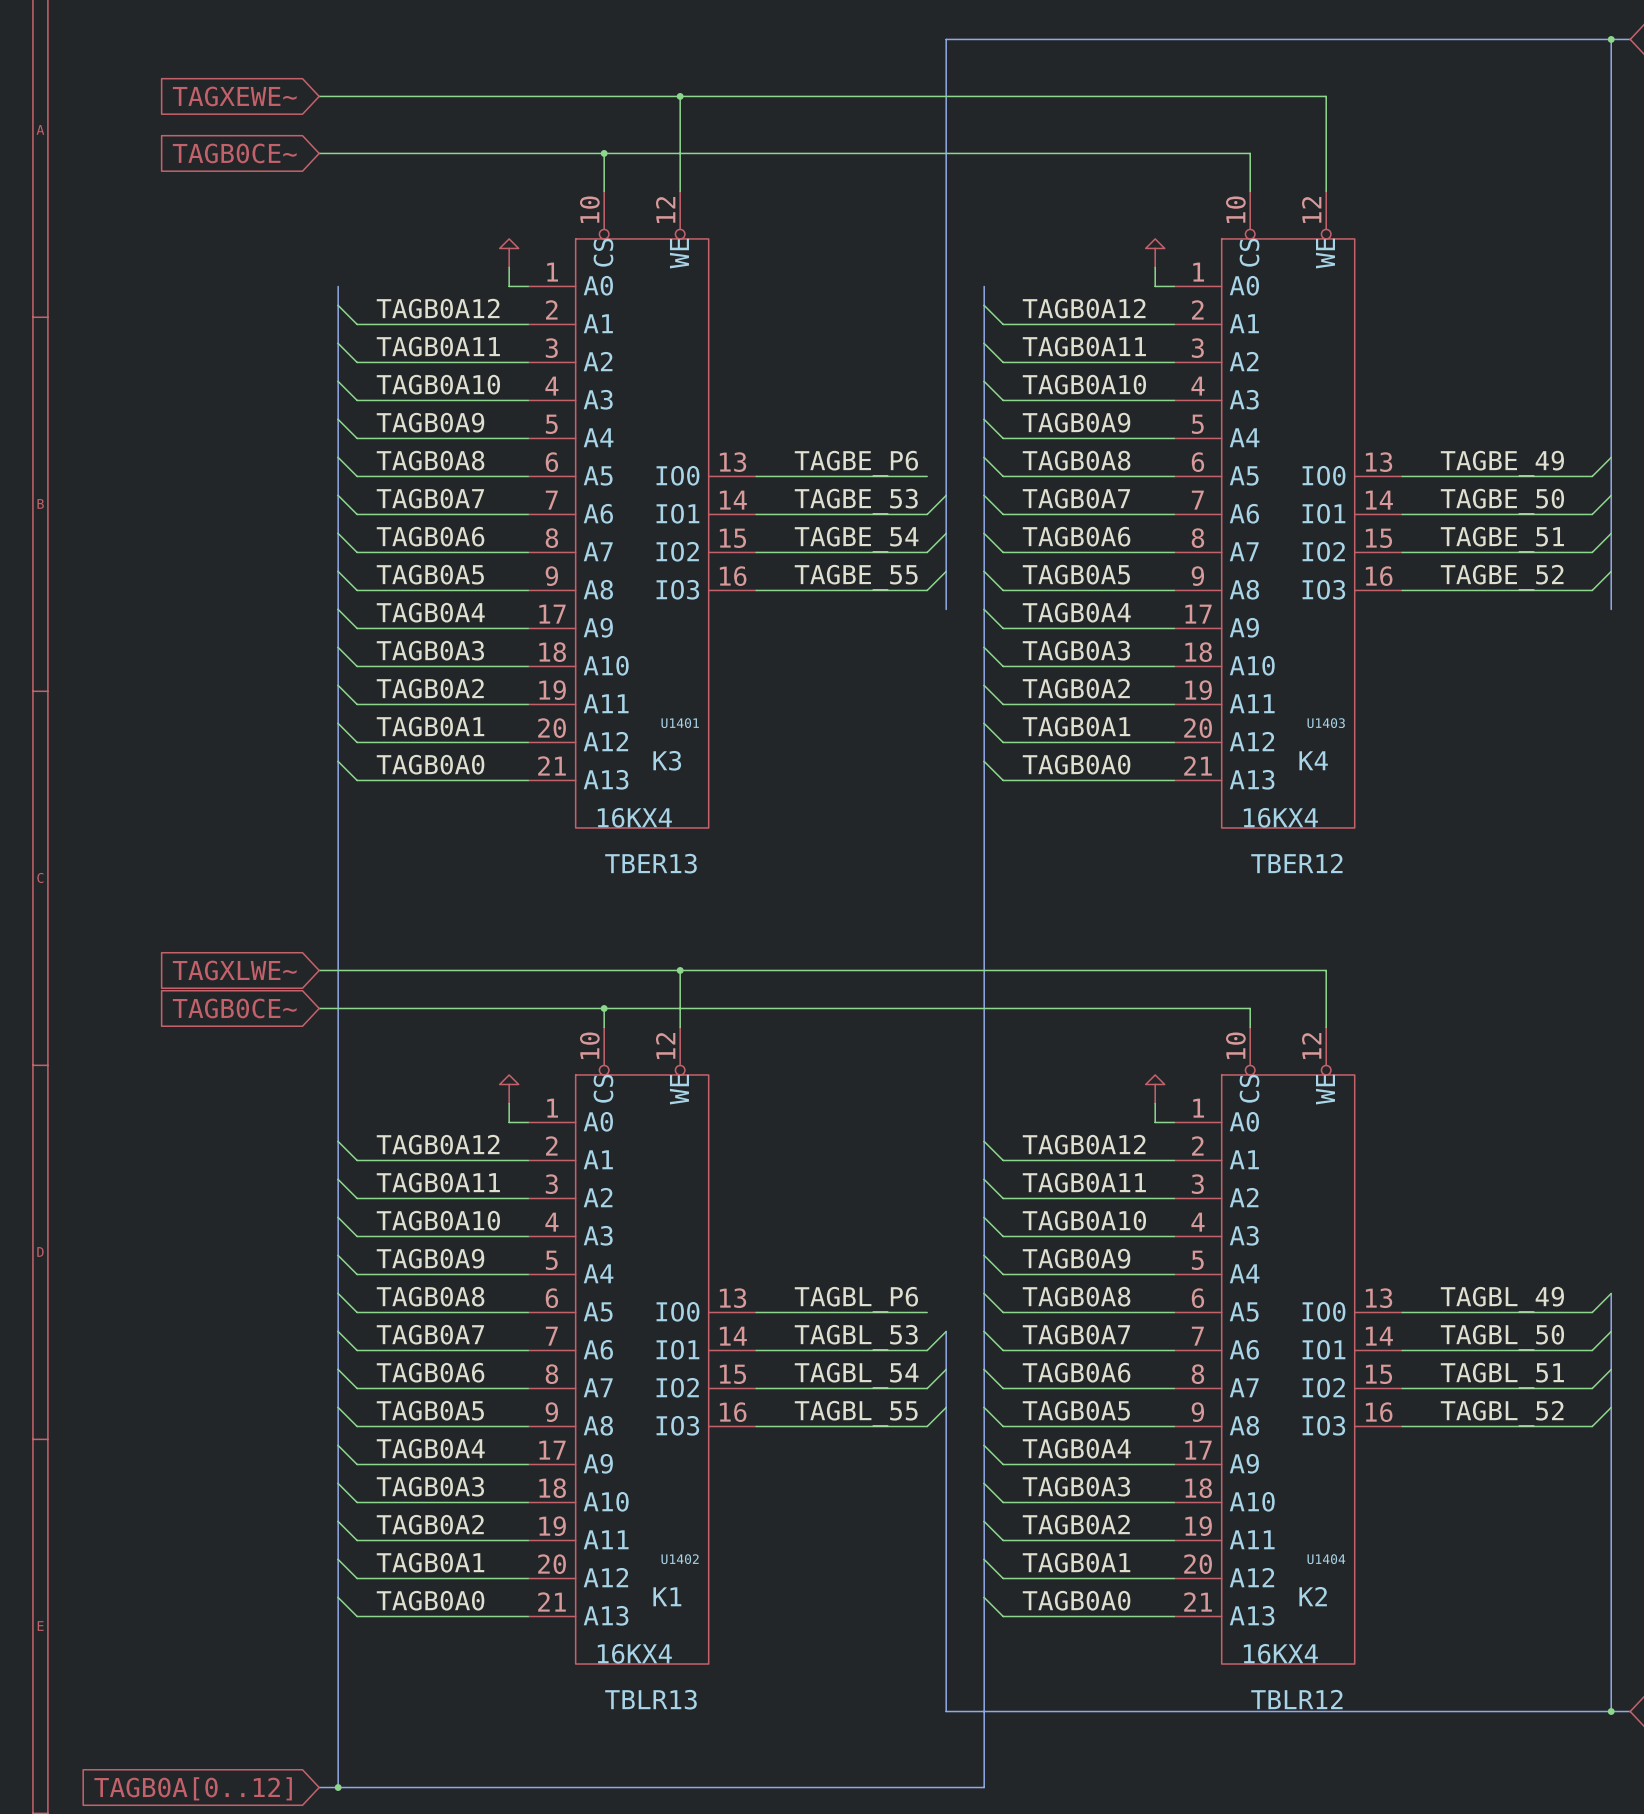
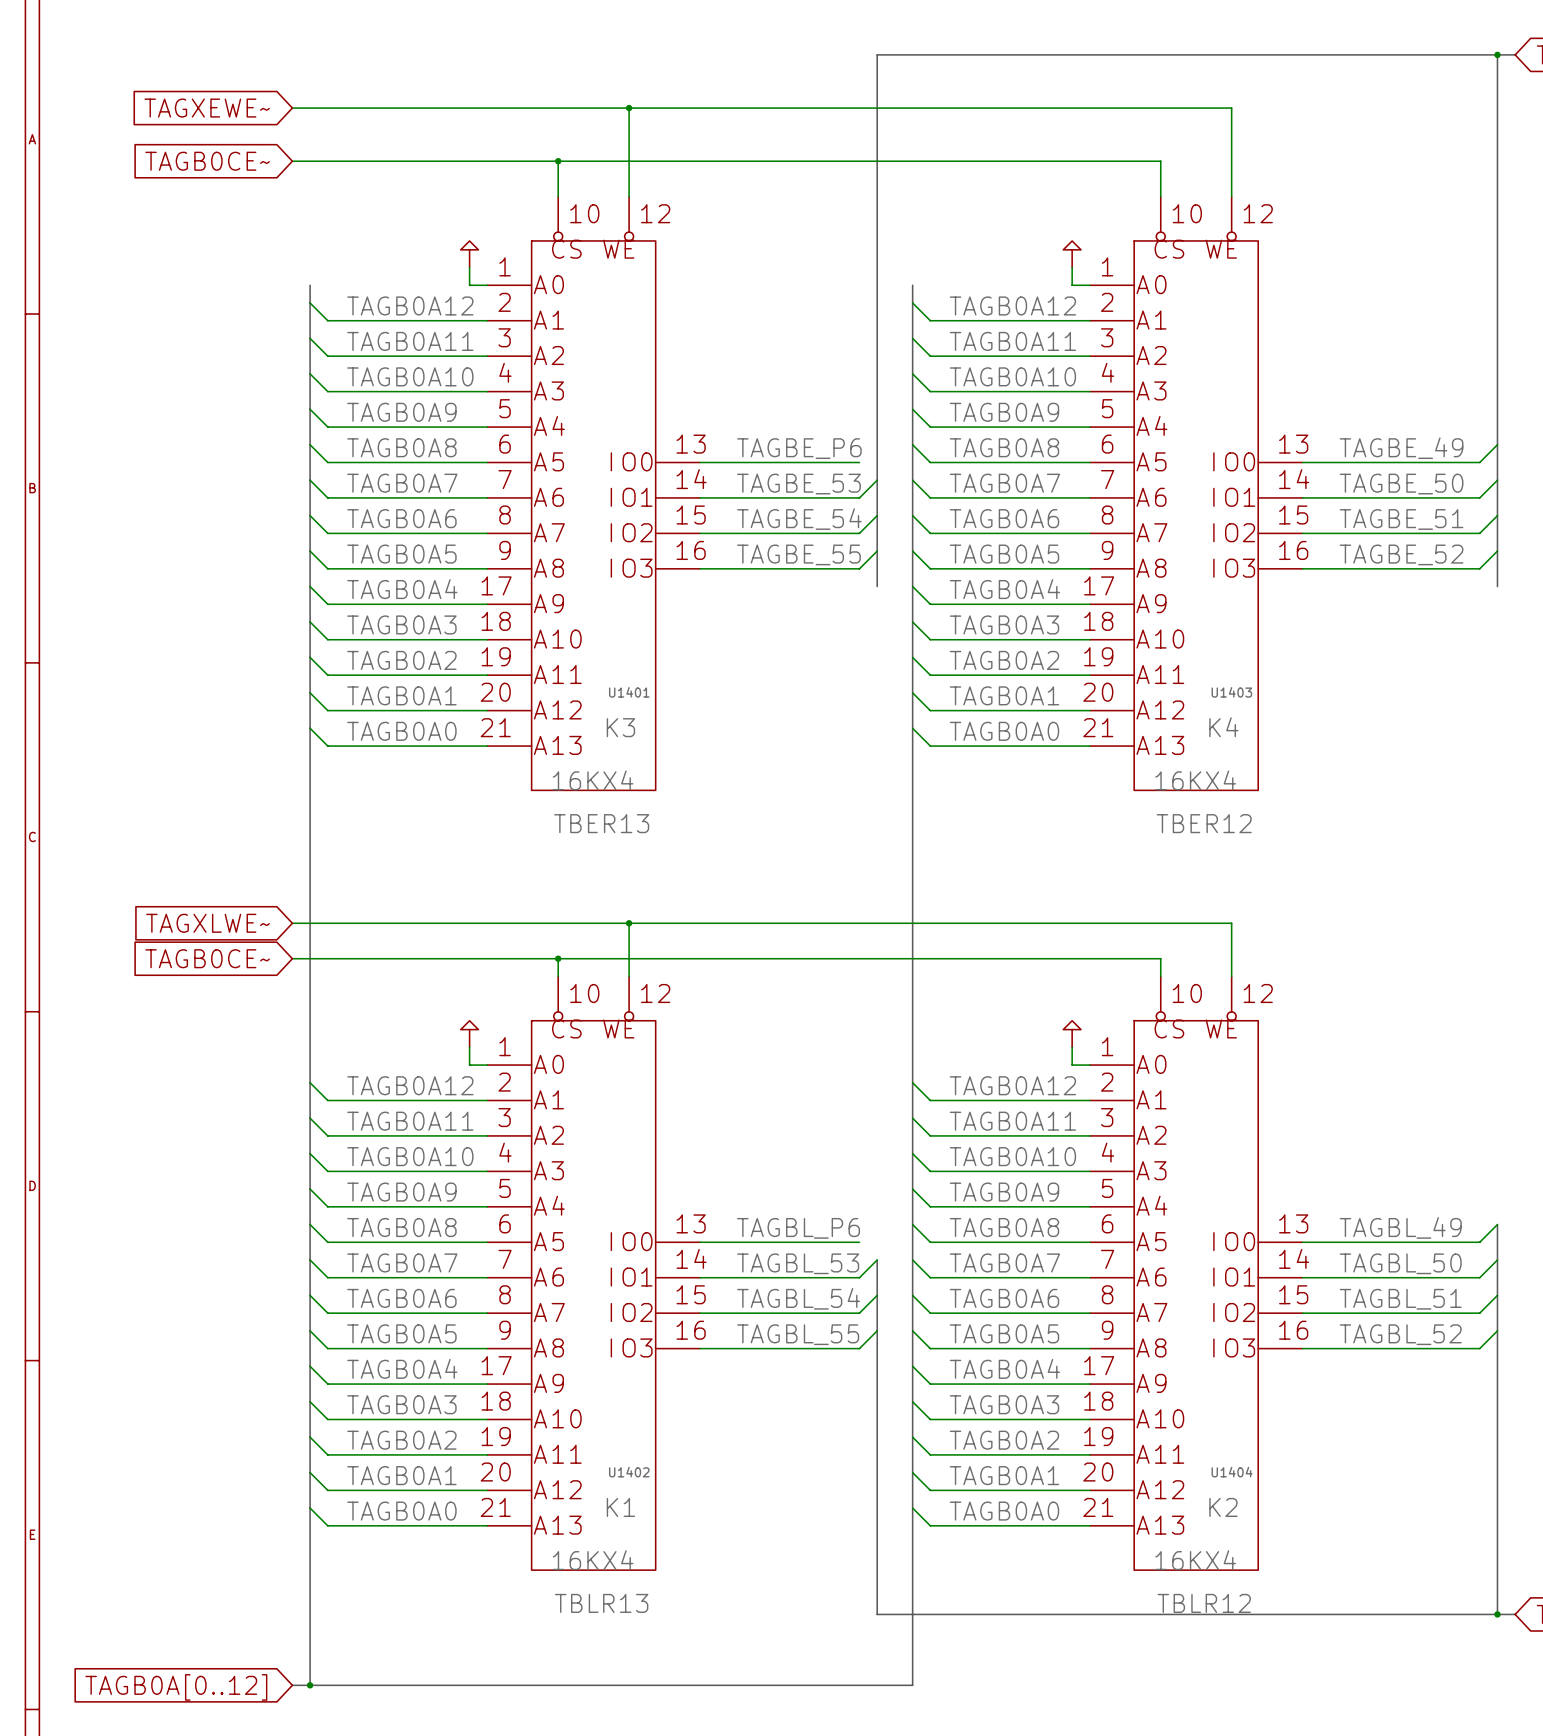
U1401 symbol: [528, 191, 757, 828] -> [487, 196, 700, 791]
U1403 symbol: [1174, 191, 1403, 828] -> [1089, 196, 1303, 791]
U1402 symbol: [528, 1027, 757, 1665] -> [487, 976, 700, 1571]
U1404 symbol: [1174, 1027, 1403, 1665] -> [1089, 976, 1303, 1571]

